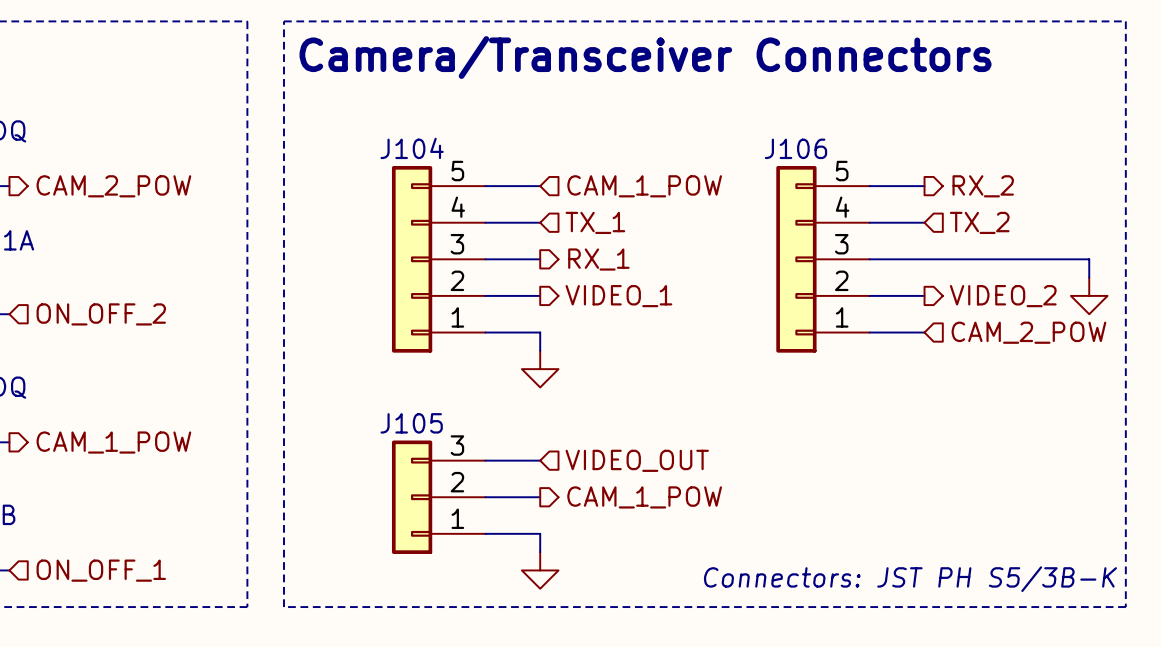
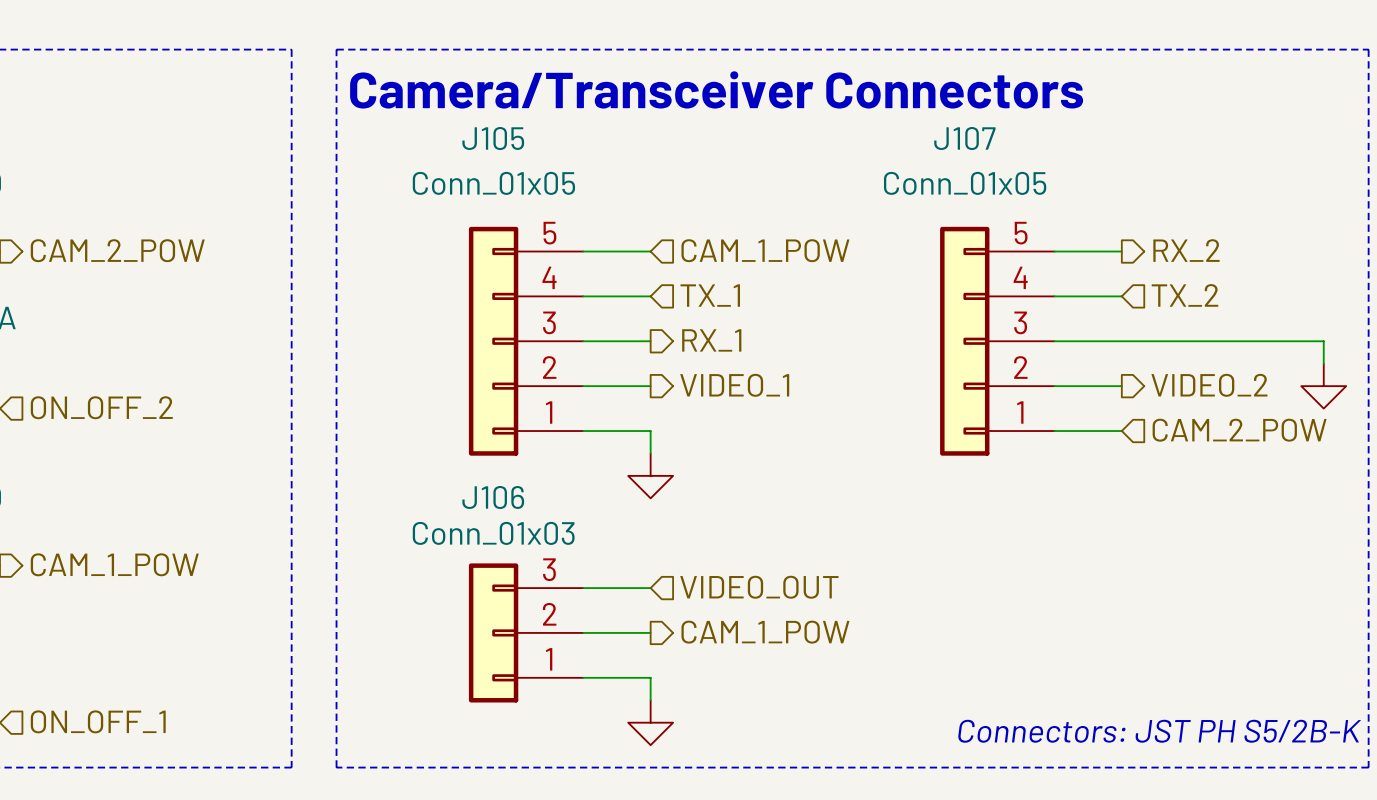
J104 value: none -> Conn_01x05 (493, 183)
J106 value: none -> Conn_01x05 (965, 183)
J104 name: J104 (412, 148) -> J105 (493, 138)
J106 name: J106 (795, 148) -> J107 (964, 138)
J105 value: none -> Conn_01x03 (493, 533)
J105 name: J105 (411, 423) -> J106 (493, 497)
text: Connectors: JST PH S5/3B-K (910, 579) -> Connectors: JST PH S5/2B-K (1159, 731)

